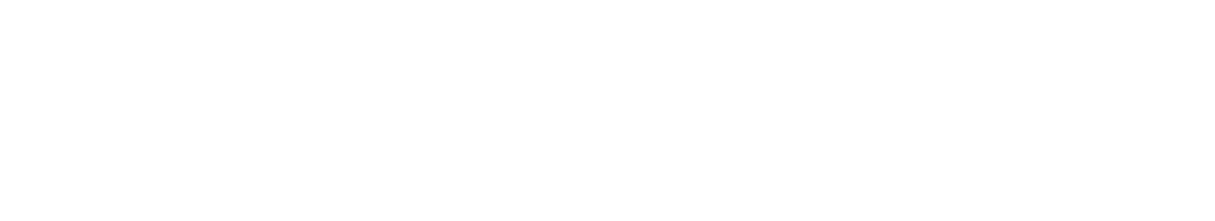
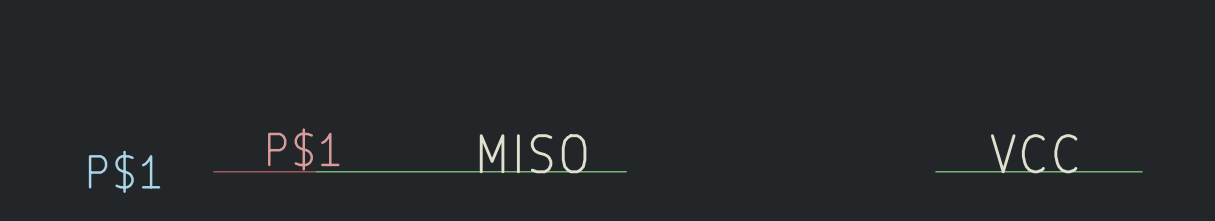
label: none -> MISO (533, 153)
label: none -> VCC (1034, 153)
part: none -> (265, 171)
wire: none -> (316, 171) (626, 171)
wire: none -> (935, 171) (1142, 171)

